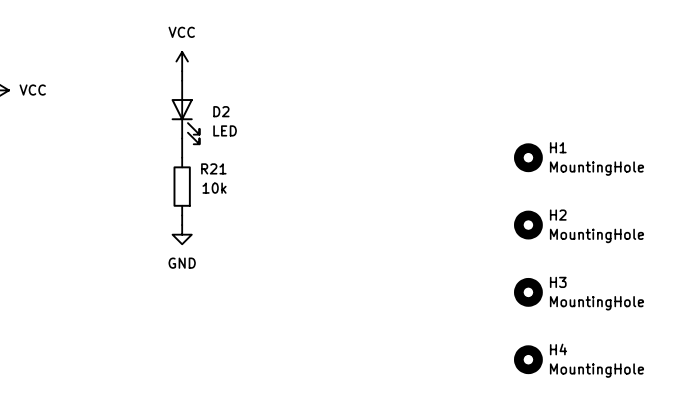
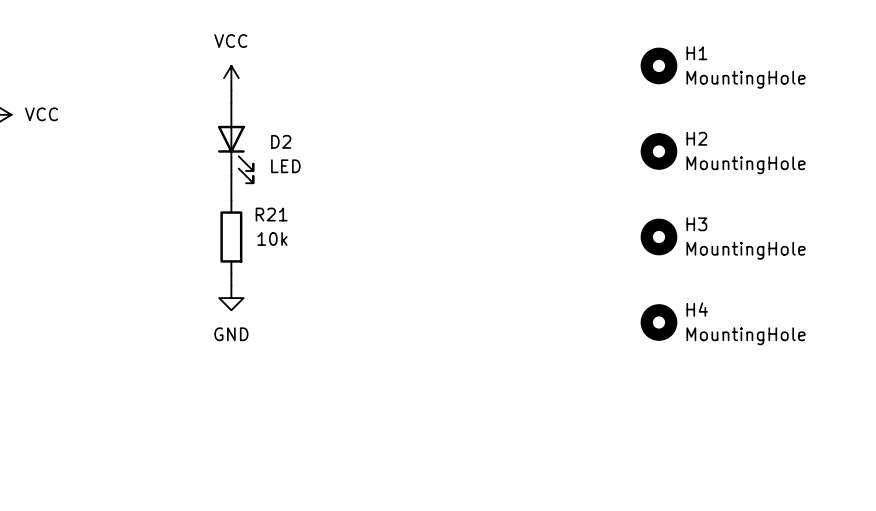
H1 position: (528, 157) -> (658, 65)
H2 position: (528, 225) -> (658, 151)
H3 position: (528, 292) -> (658, 236)
H4 position: (528, 359) -> (658, 322)

